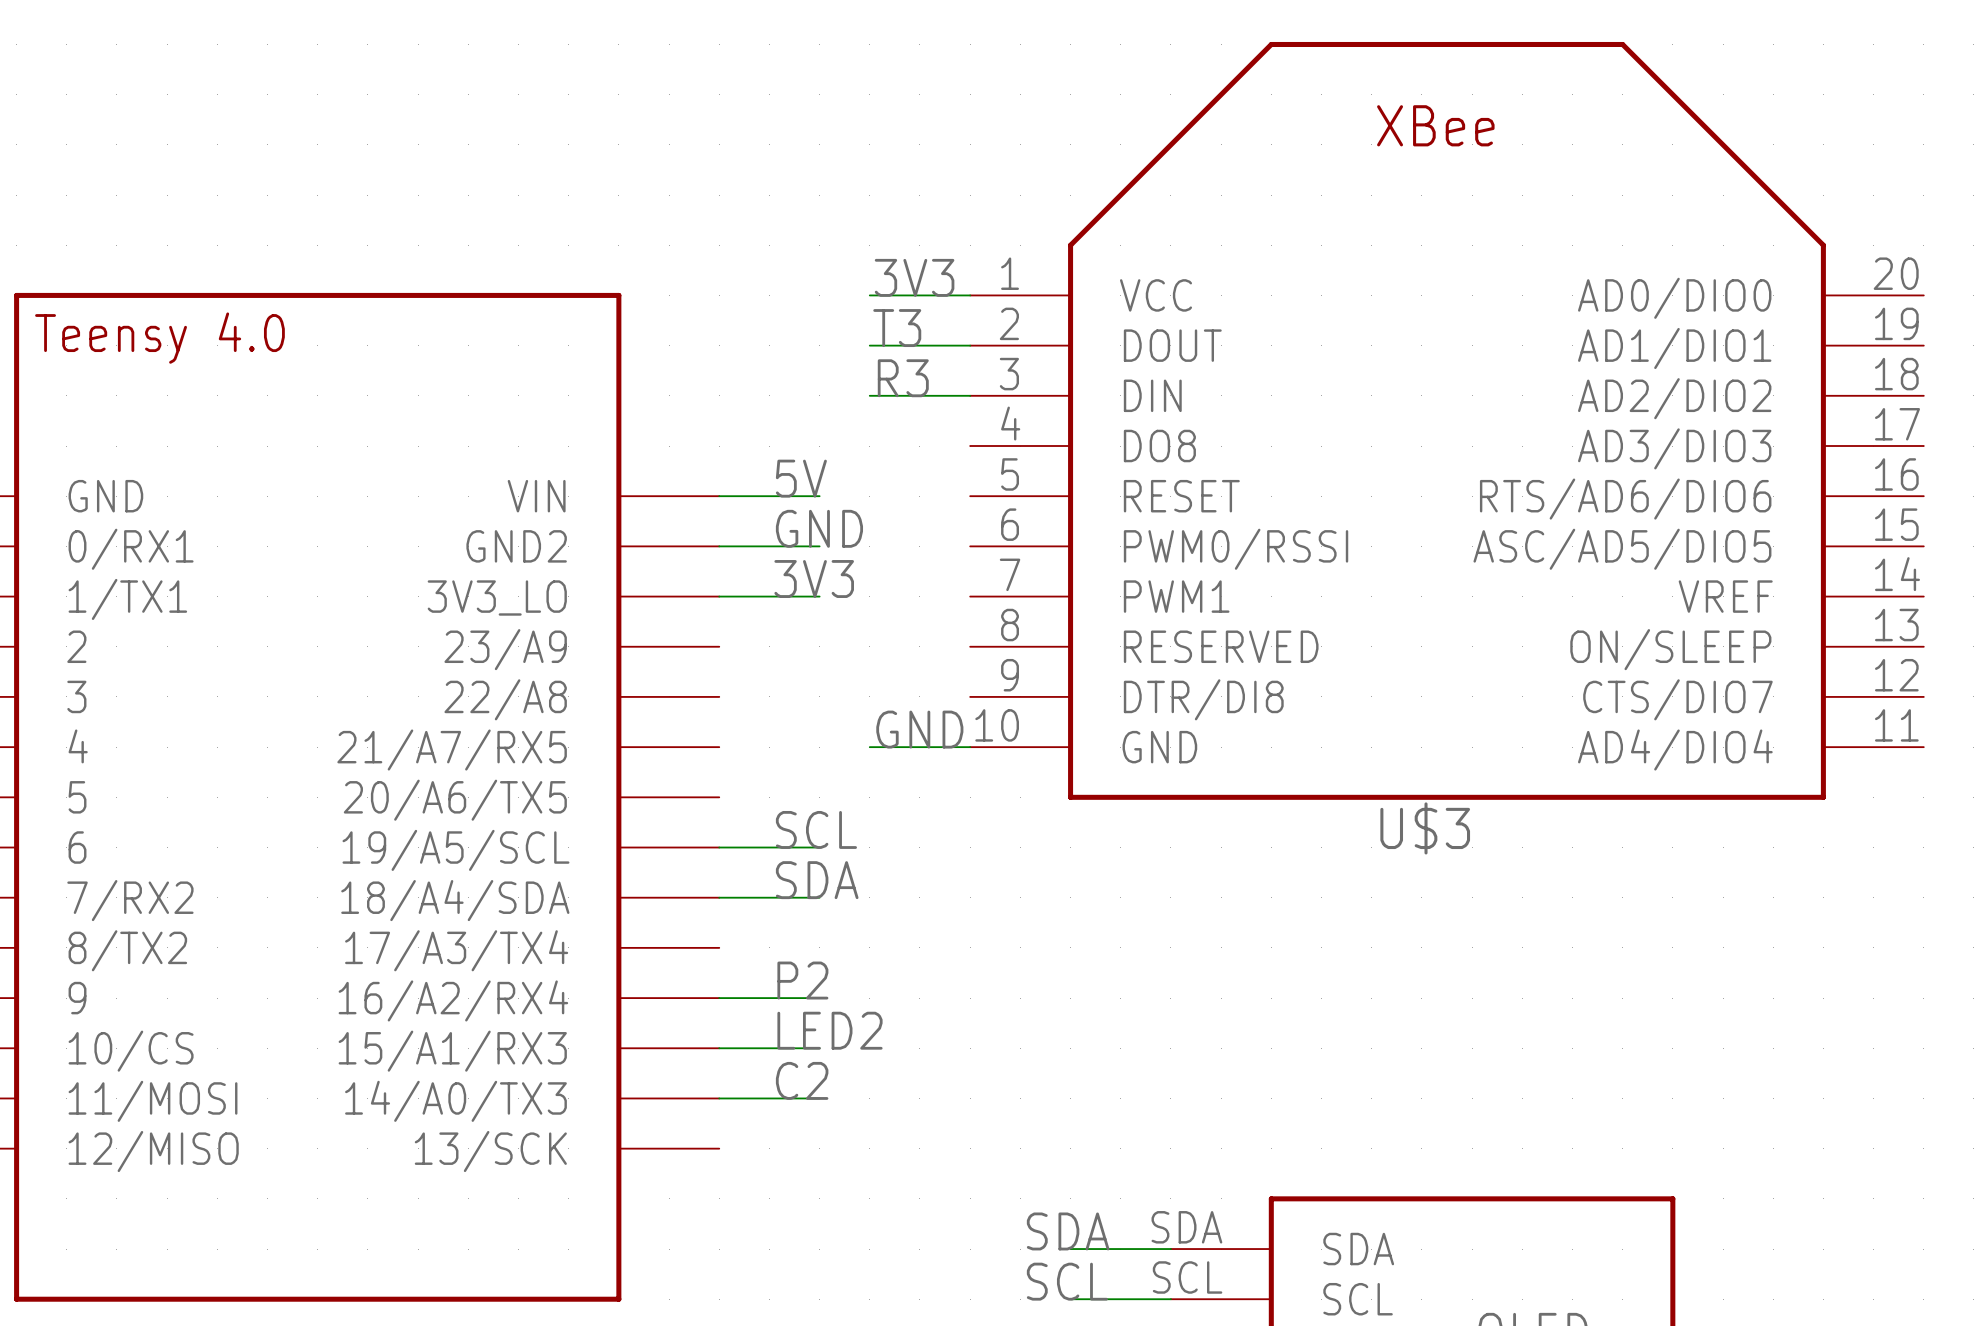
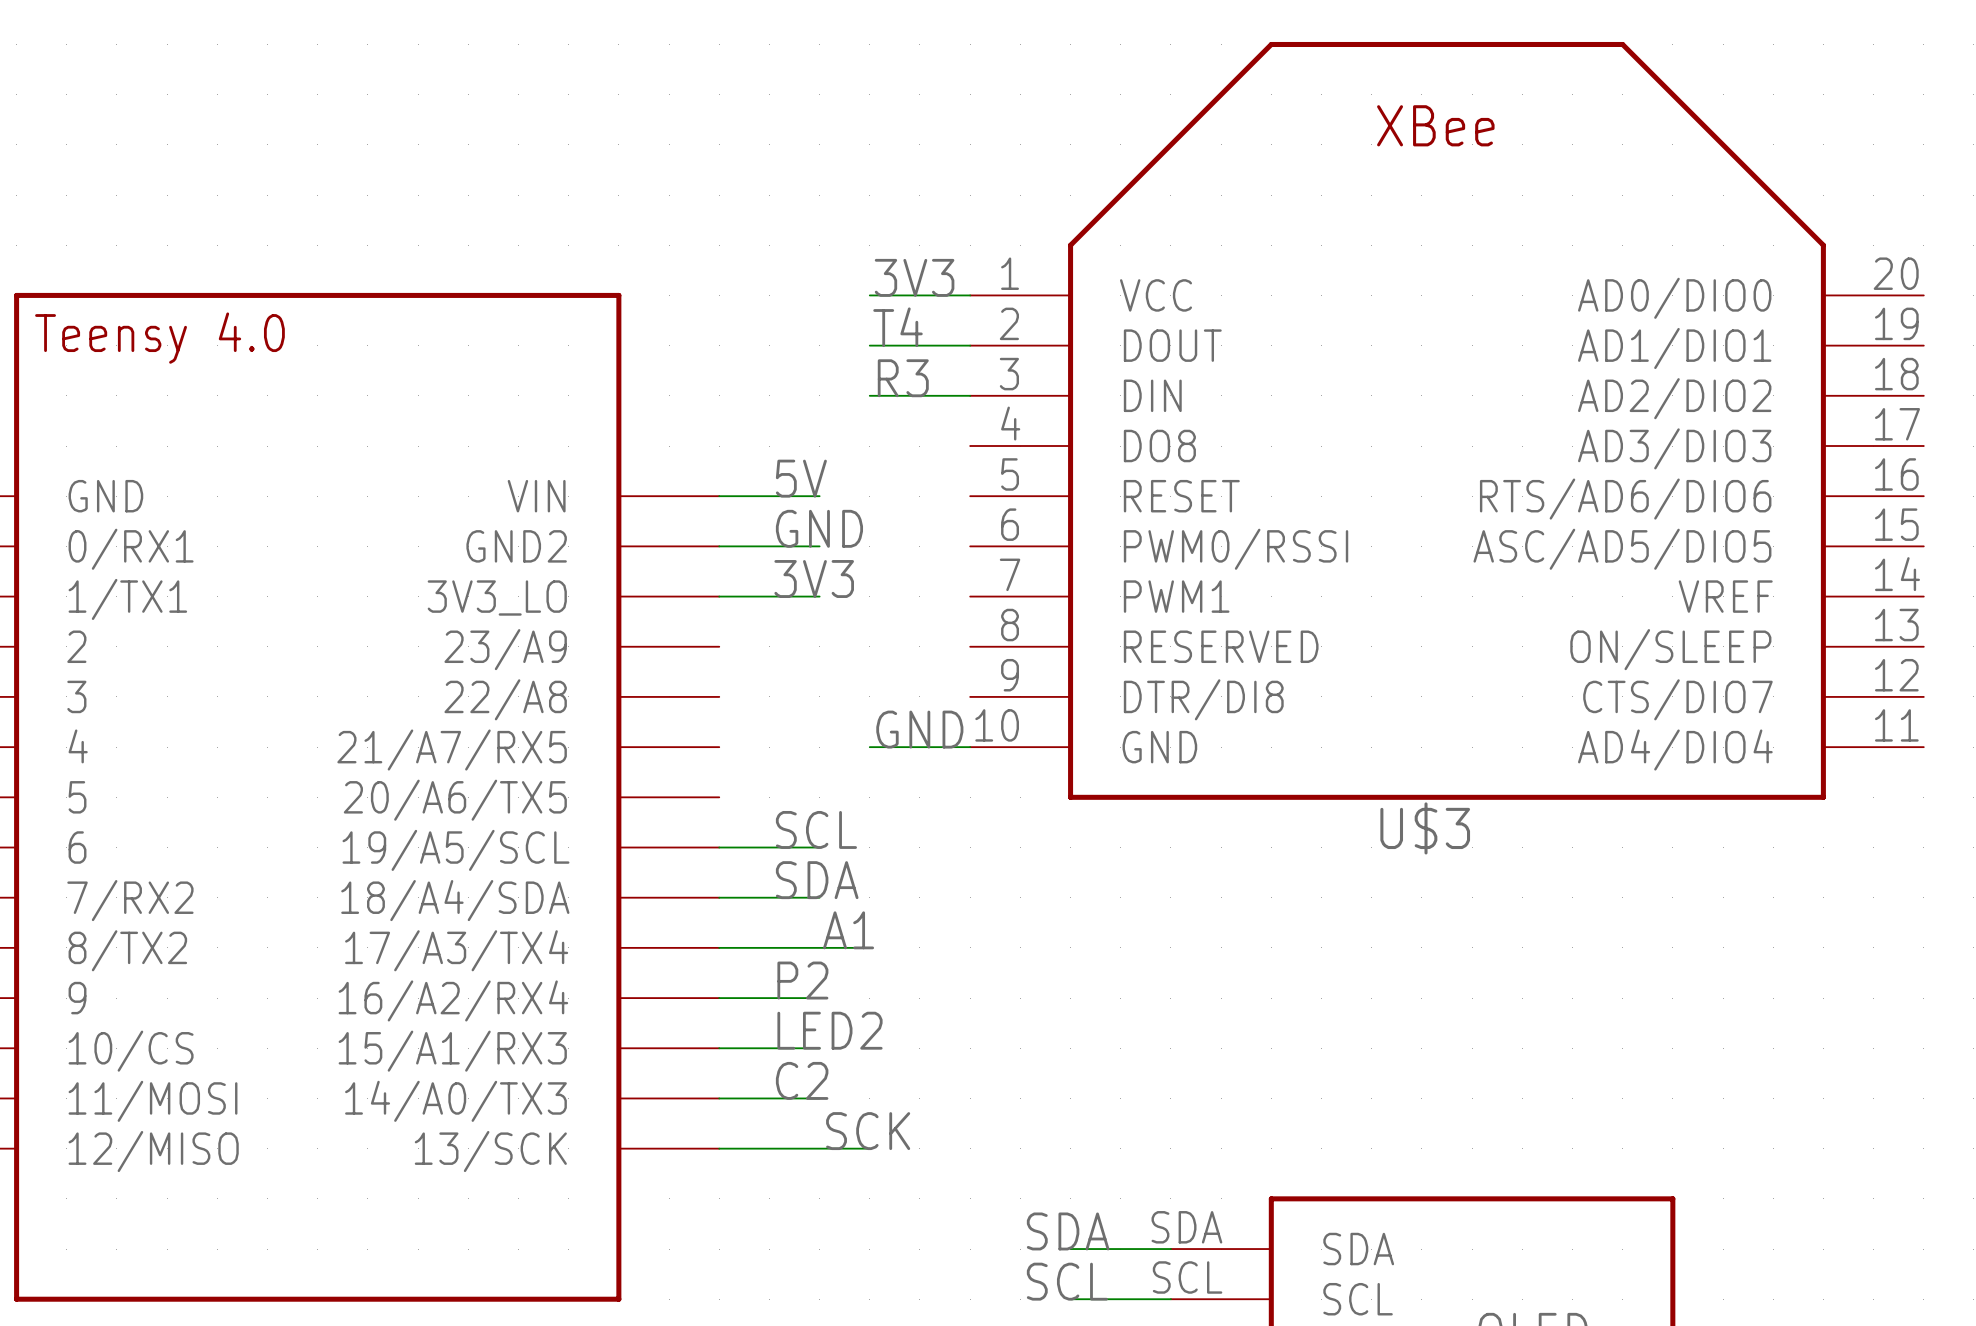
label: T3 (897, 328) -> T4 (898, 327)
label: none -> A1 (848, 930)
wire: none -> (719, 947) (869, 947)
label: none -> SCK (868, 1131)
wire: none -> (719, 1148) (869, 1148)

